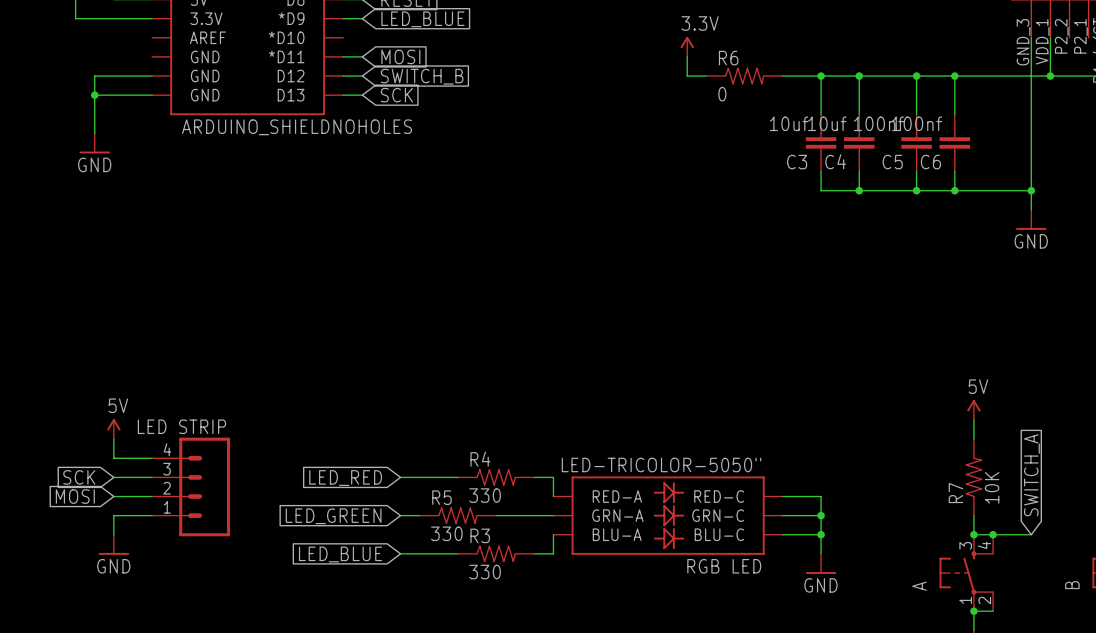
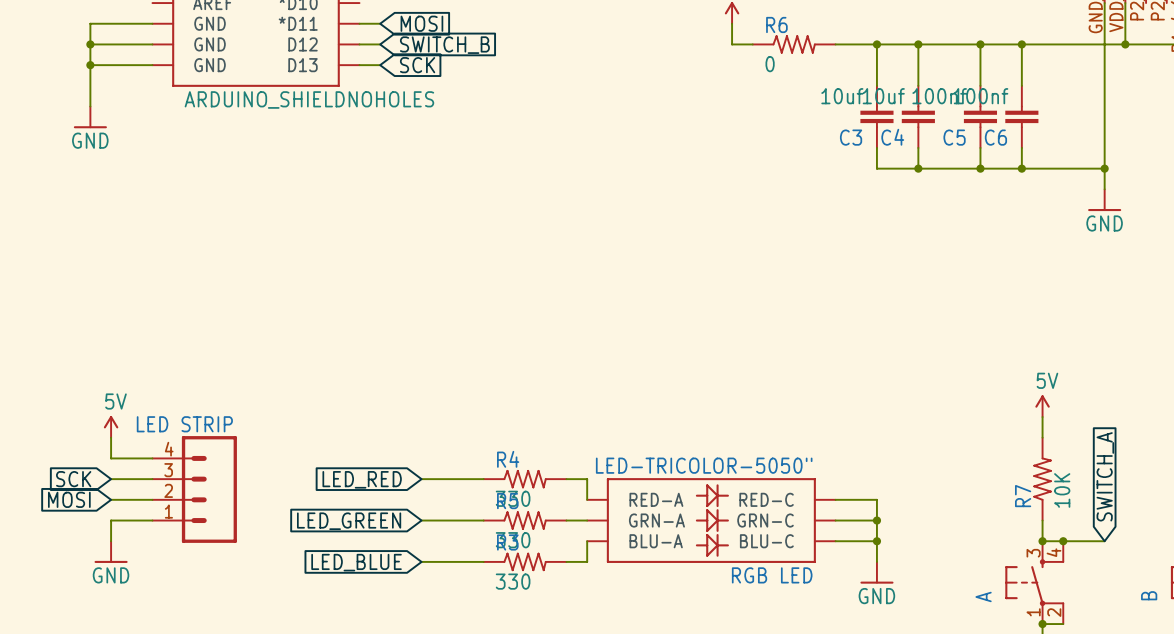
wire: none -> (152, 23) (90, 23) (90, 44)
junction: none -> (90, 44)
R5 position: (457, 515) -> (525, 520)

